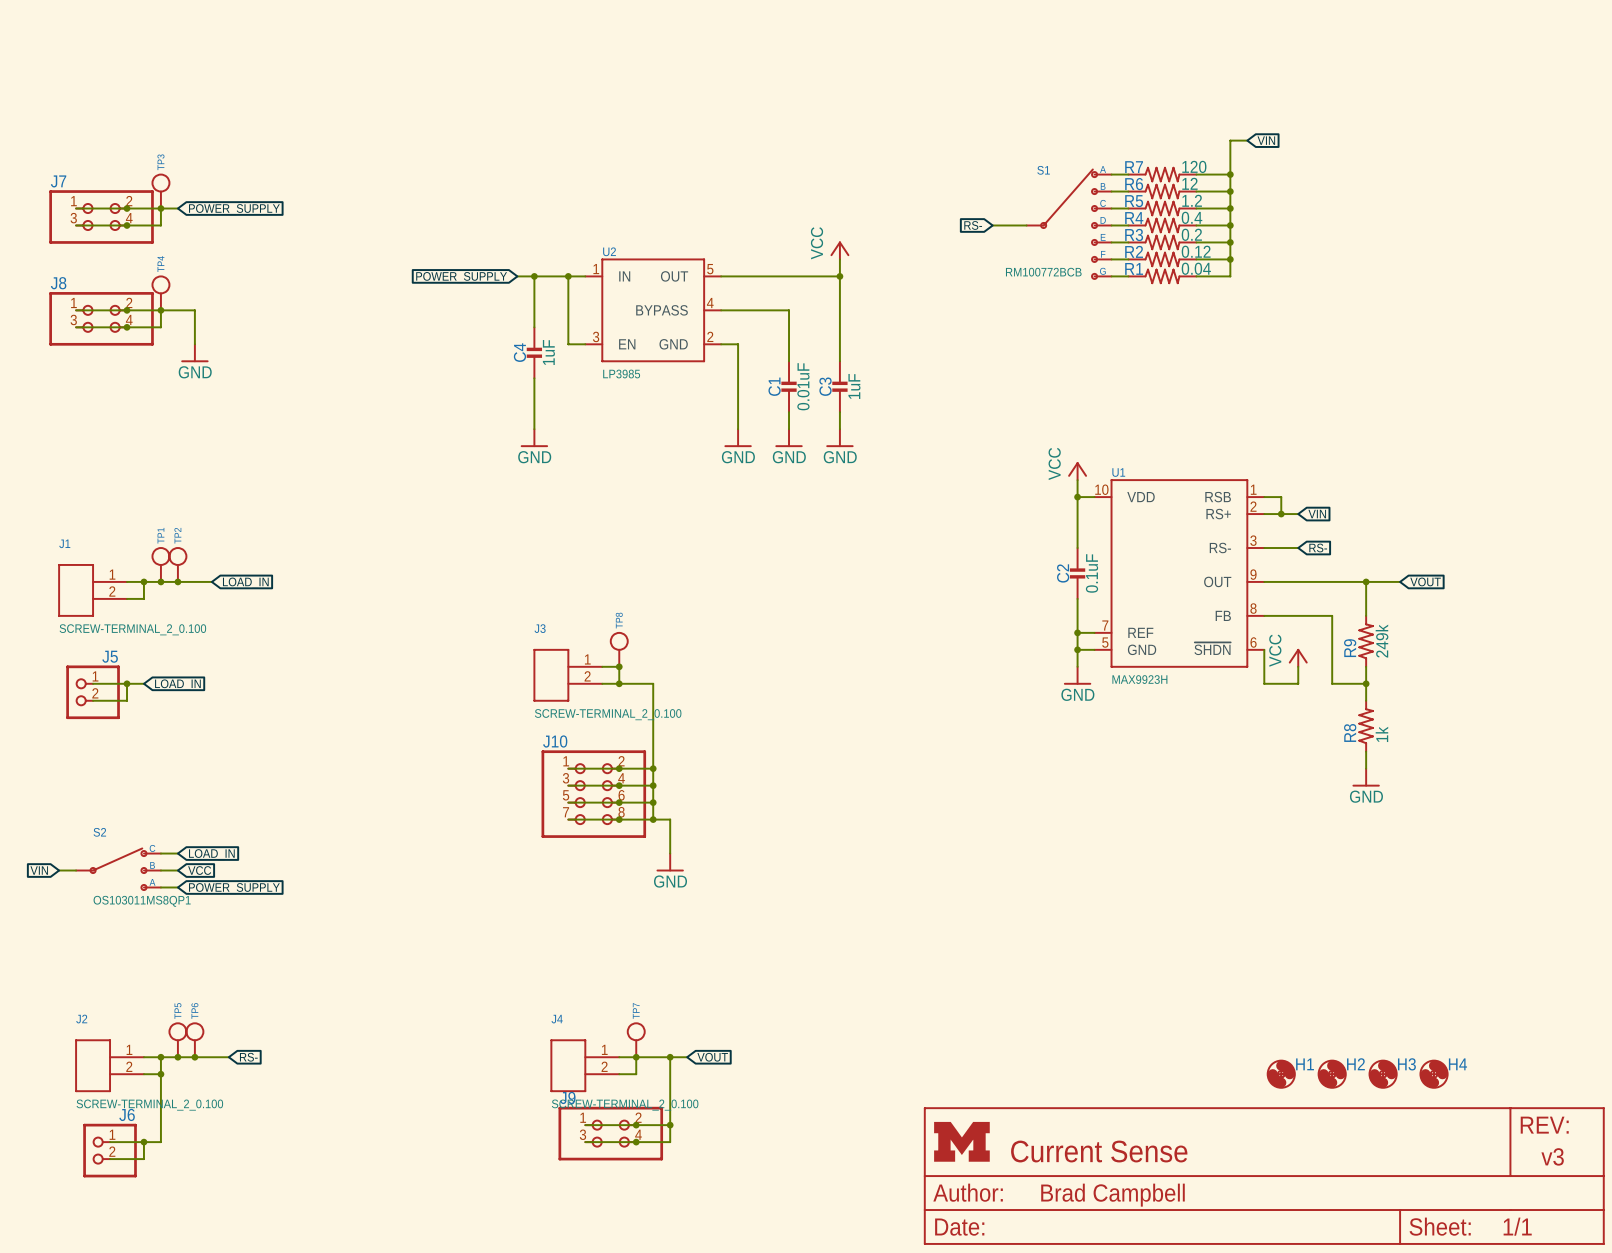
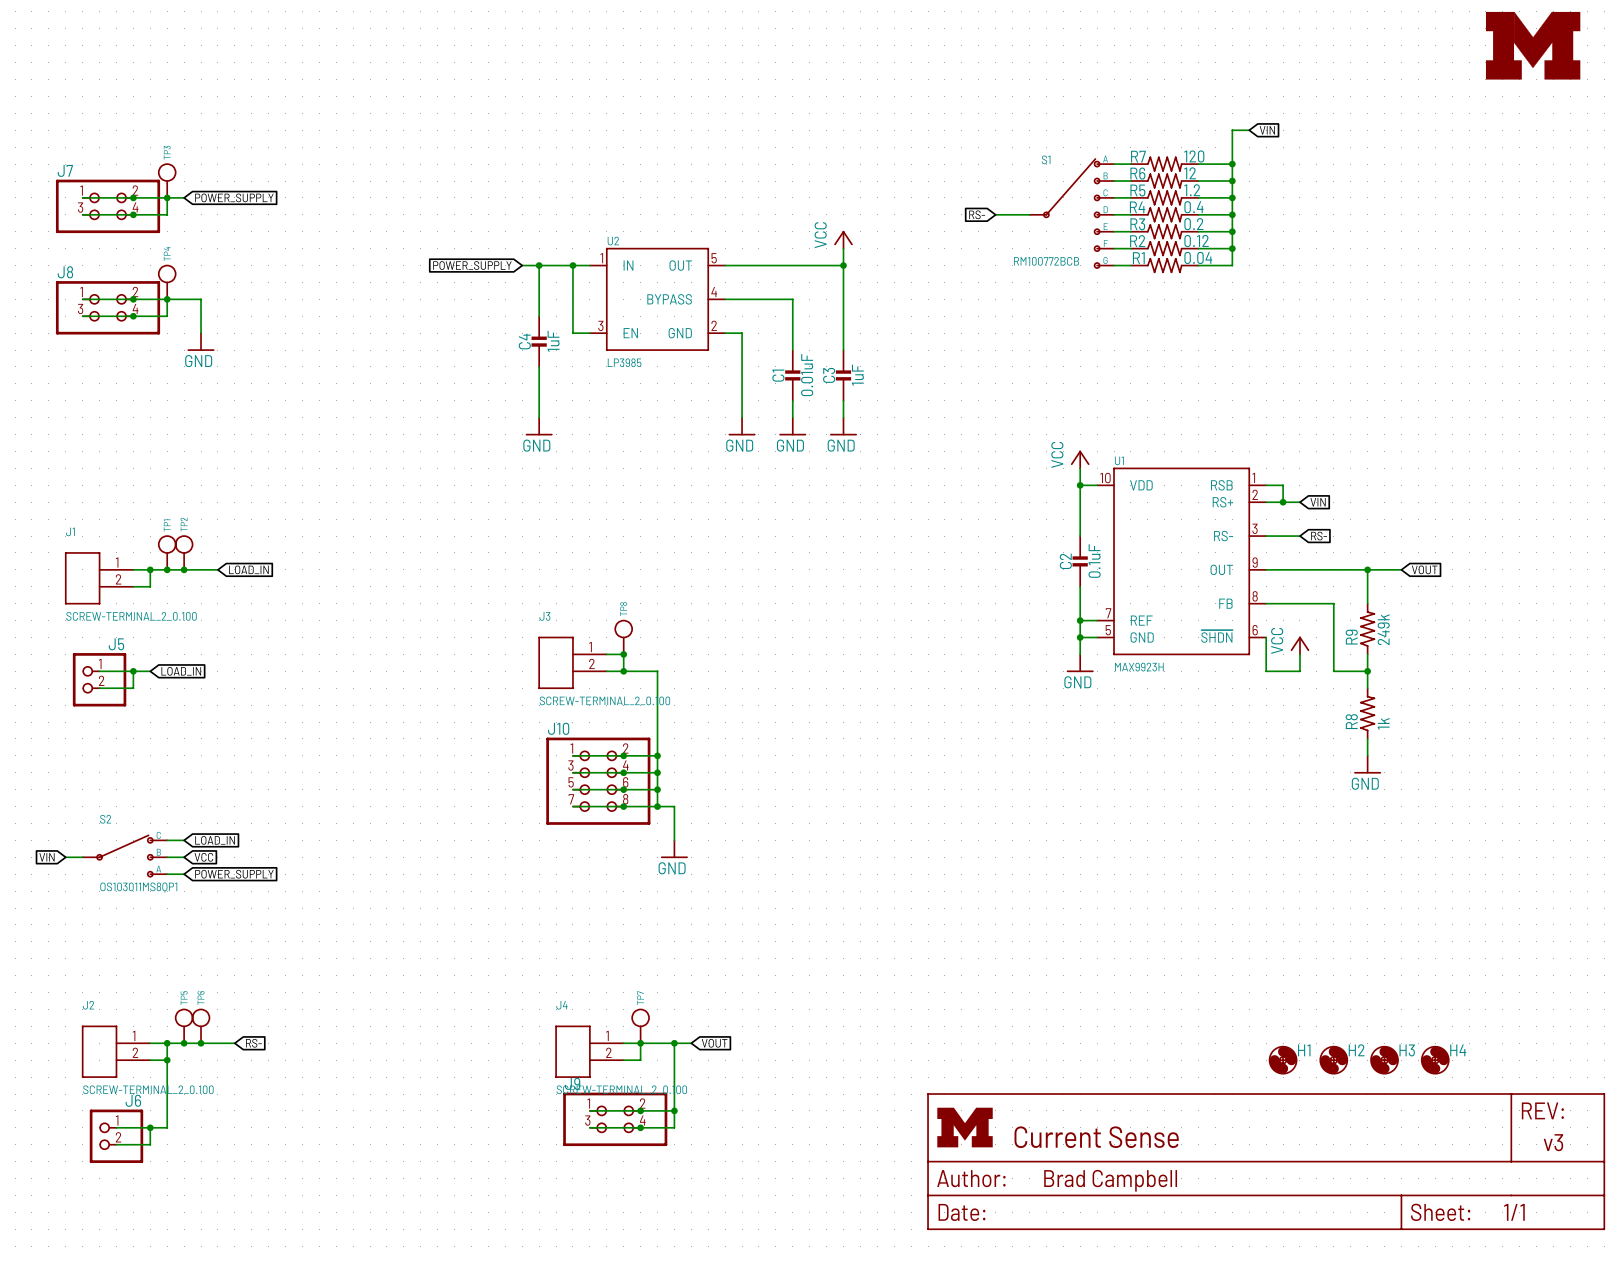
part: none -> (1533, 45)

